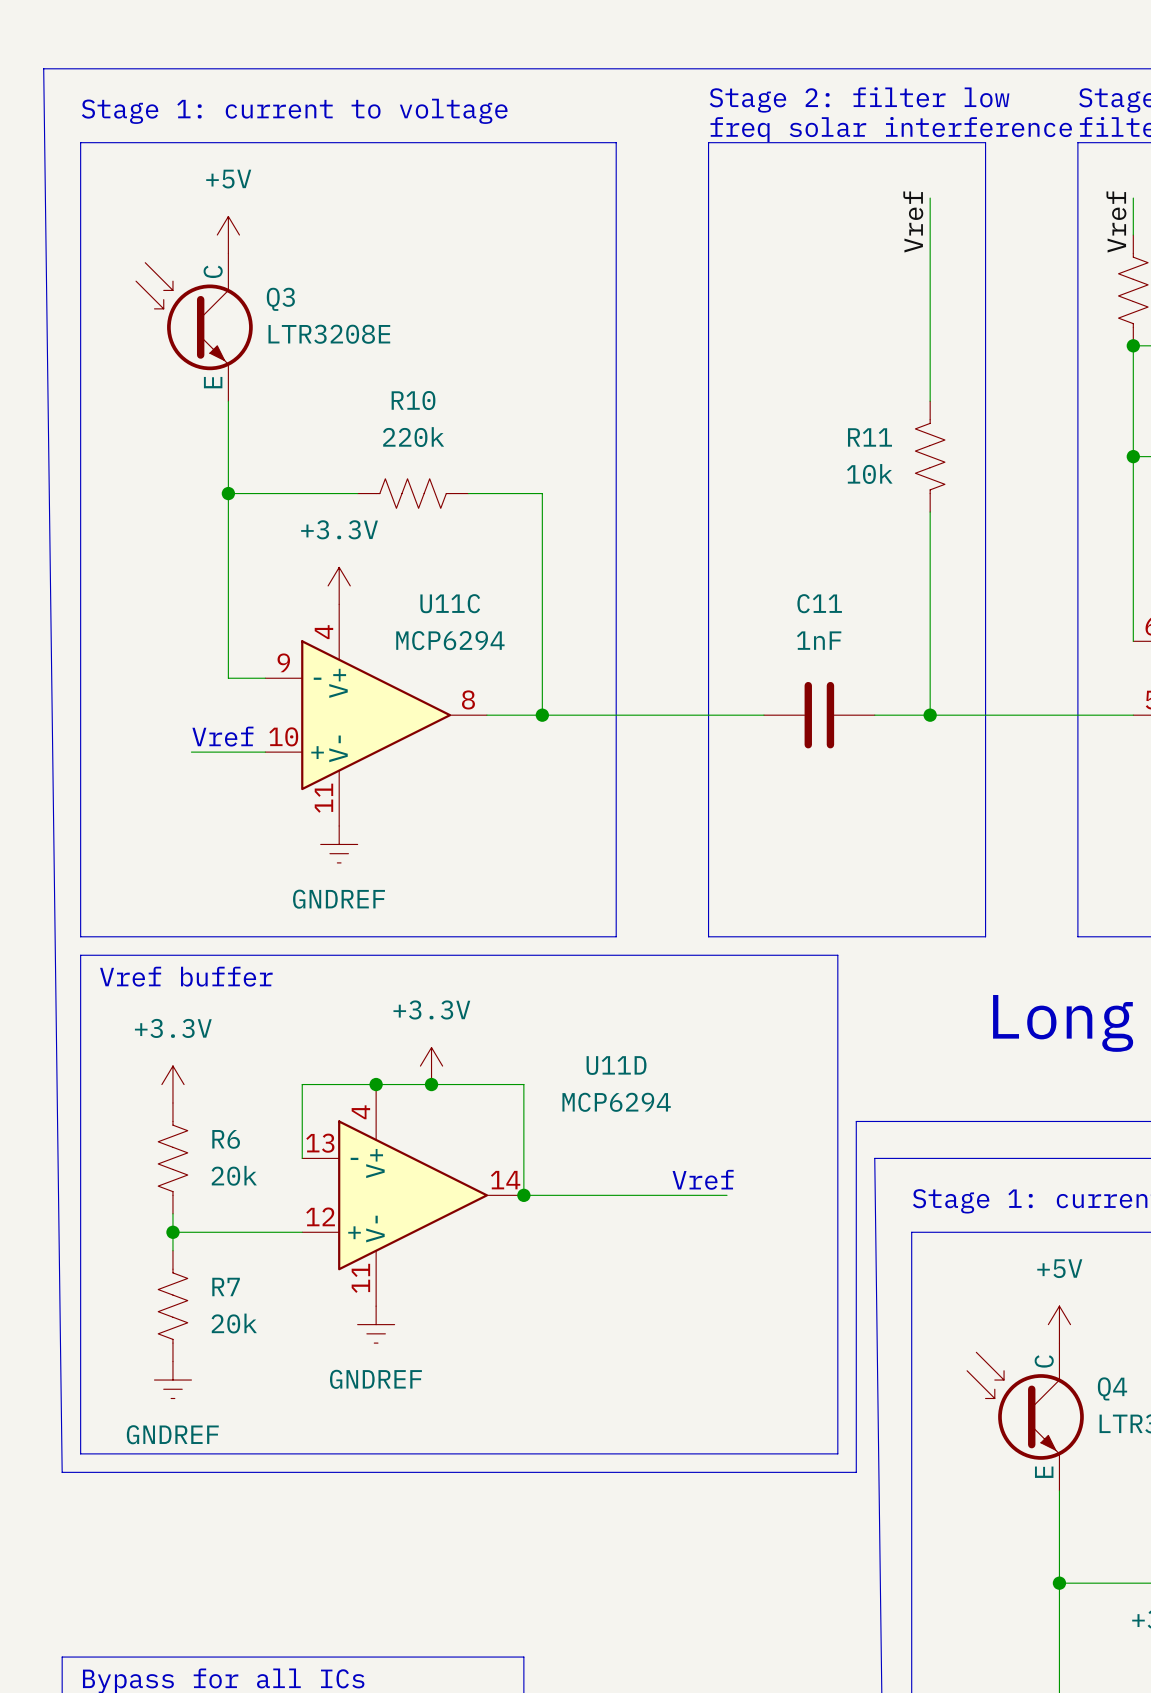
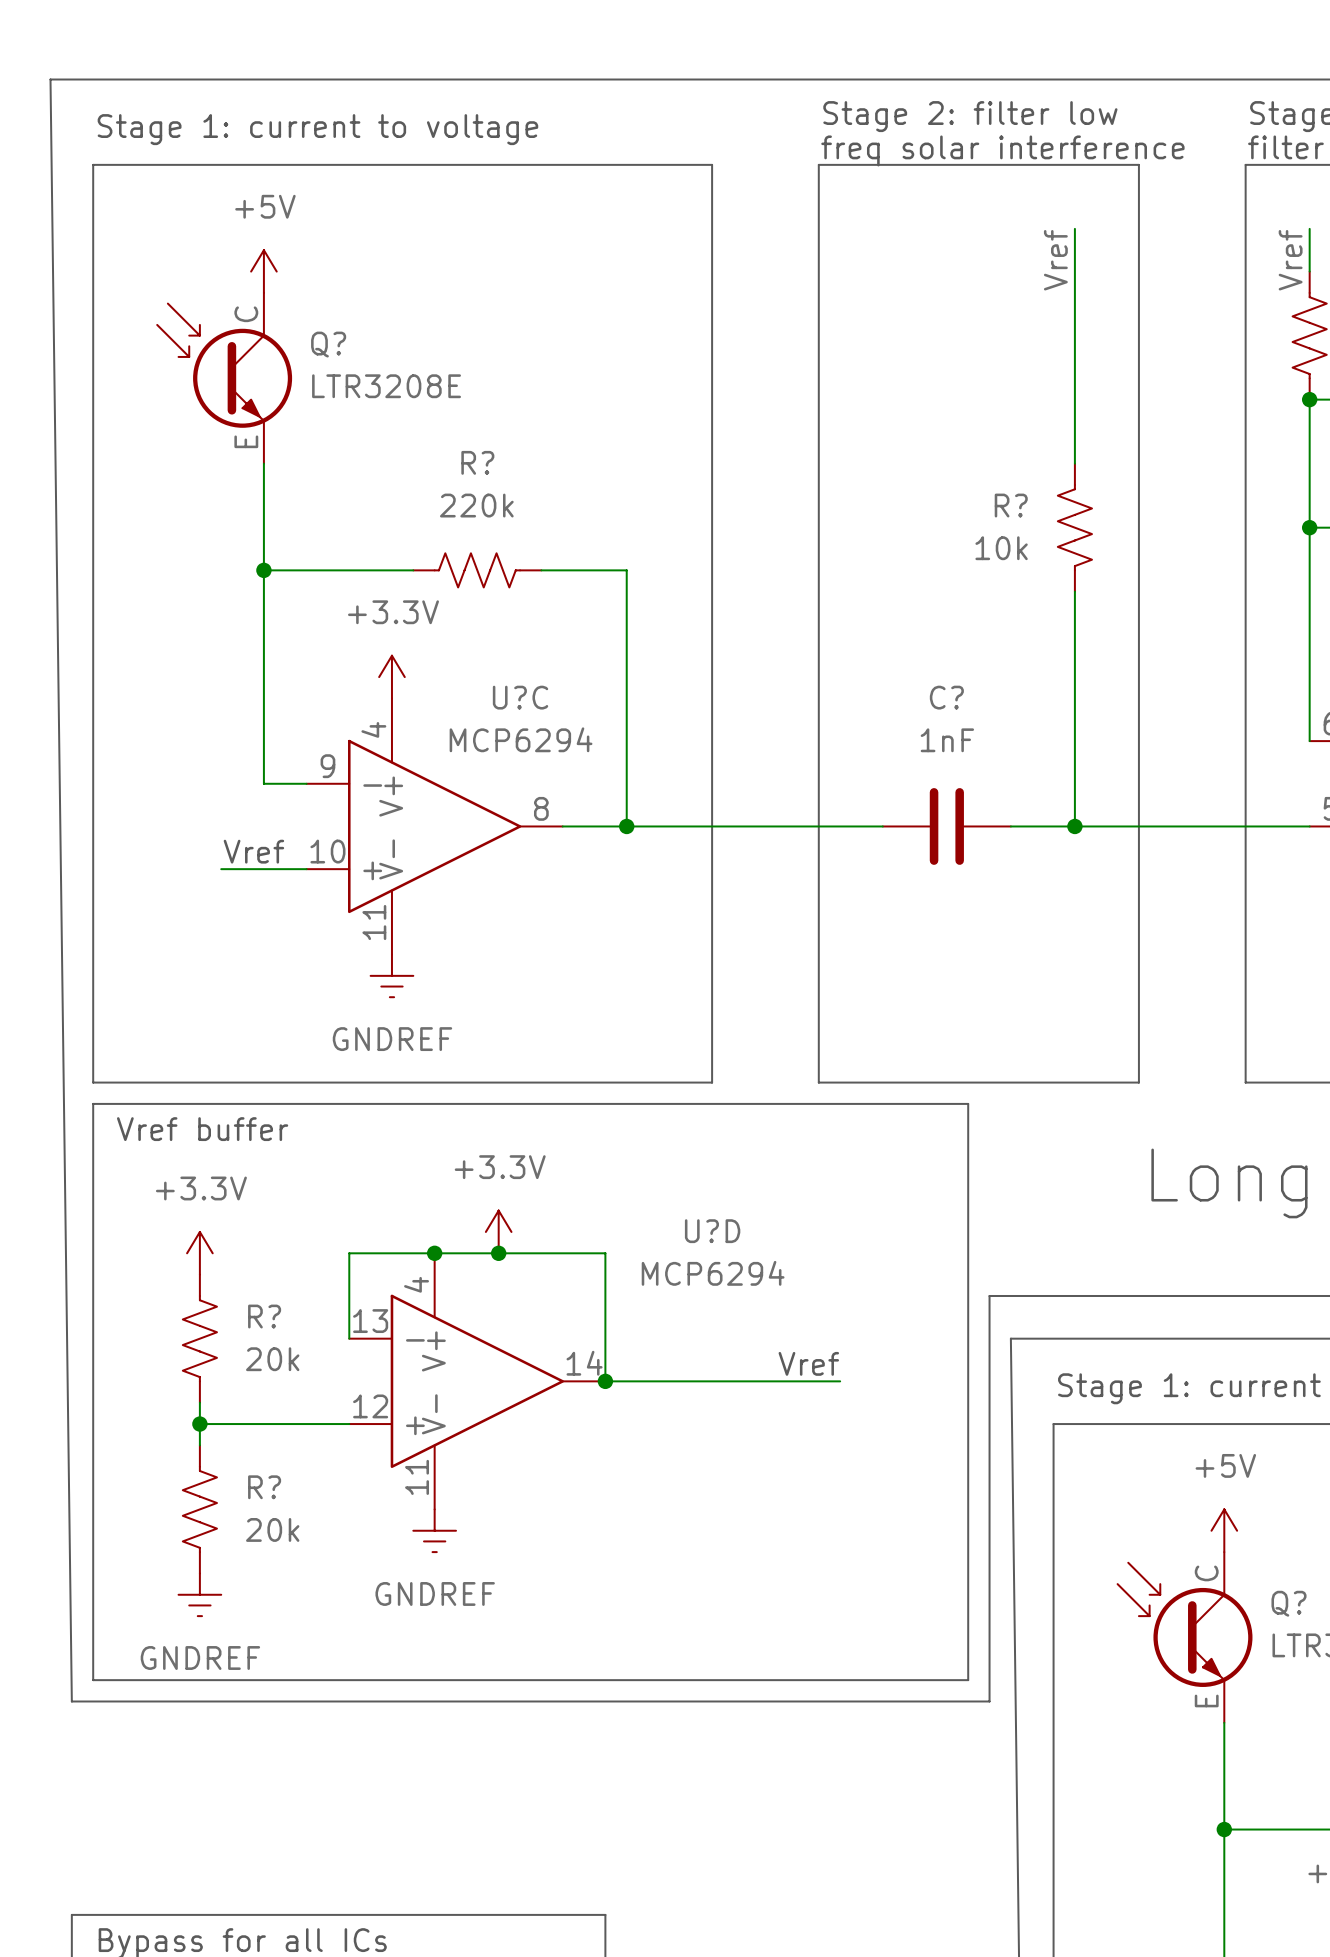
Q3 name: Q3 (280, 299) -> Q? (328, 344)
R10 name: R10 (413, 400) -> R? (477, 462)
R11 name: R11 (869, 437) -> R? (1011, 505)
U11C name: U11C (450, 603) -> U?C (520, 697)
C11 name: C11 (819, 603) -> C? (946, 697)
U11D name: U11D (616, 1065) -> U?D (712, 1231)
R6 name: R6 (226, 1139) -> R? (264, 1316)
R7 name: R7 (226, 1286) -> R? (264, 1487)
Q4 name: Q4 (1112, 1388) -> Q? (1289, 1603)

